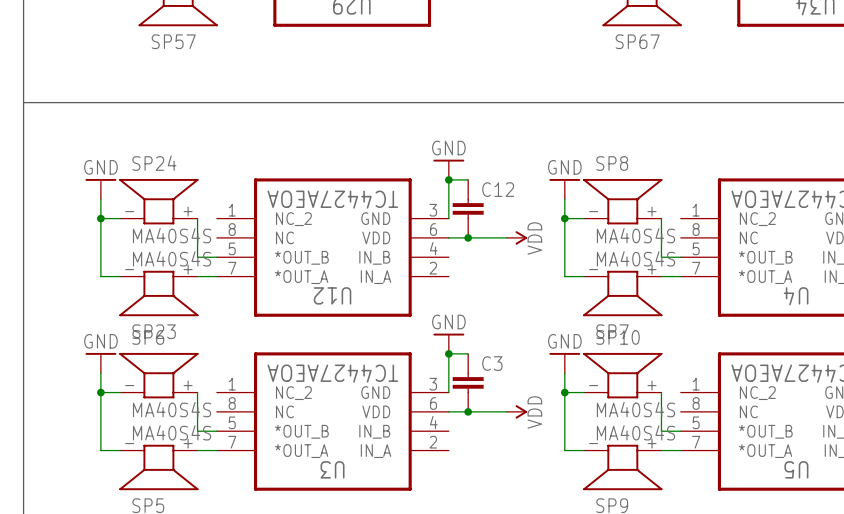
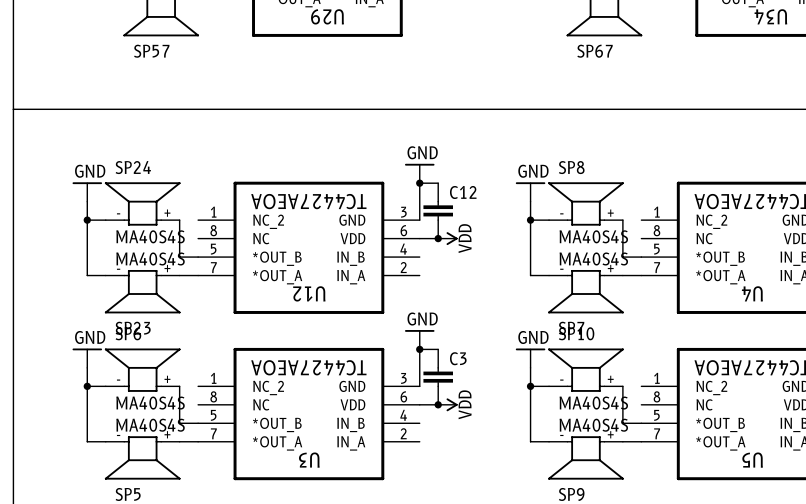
power symbol position: VDD (516, 237) -> VDD (447, 238)
power symbol position: VDD (516, 411) -> VDD (447, 404)

